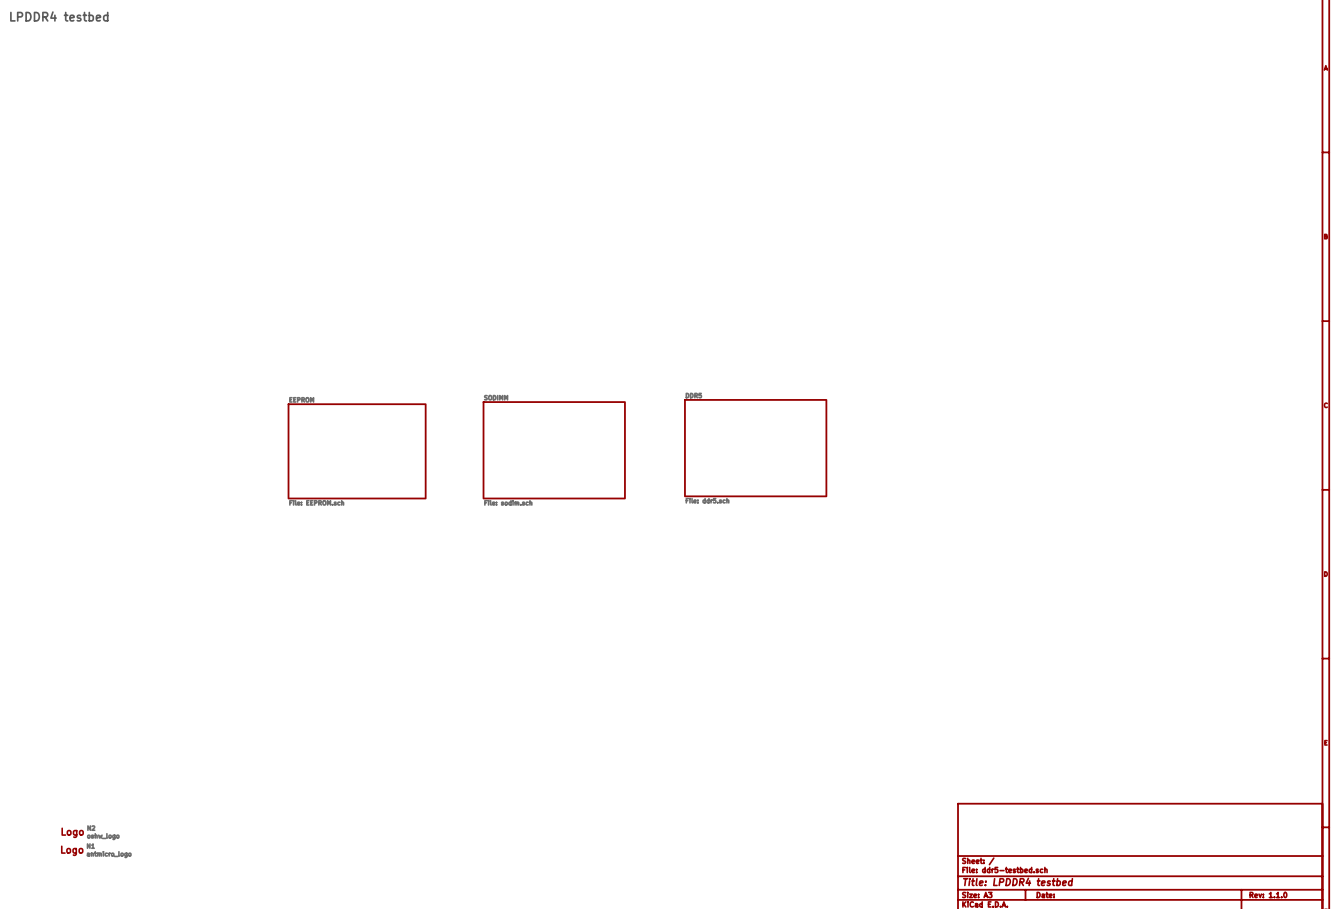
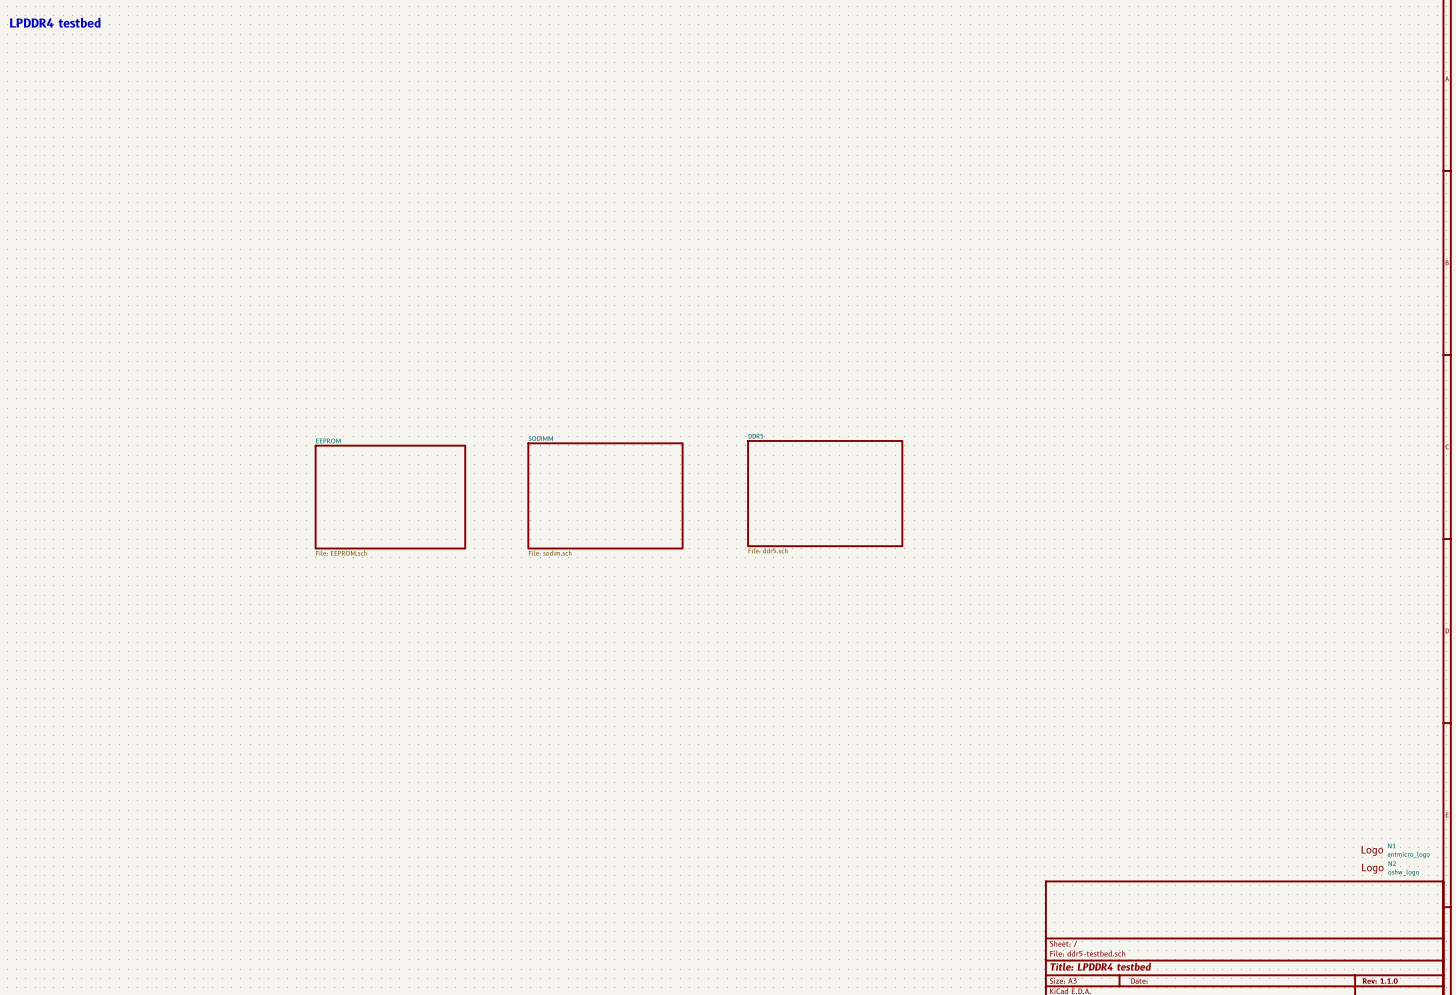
part position: (90, 832) -> (1390, 868)
part position: (96, 850) -> (1395, 850)

